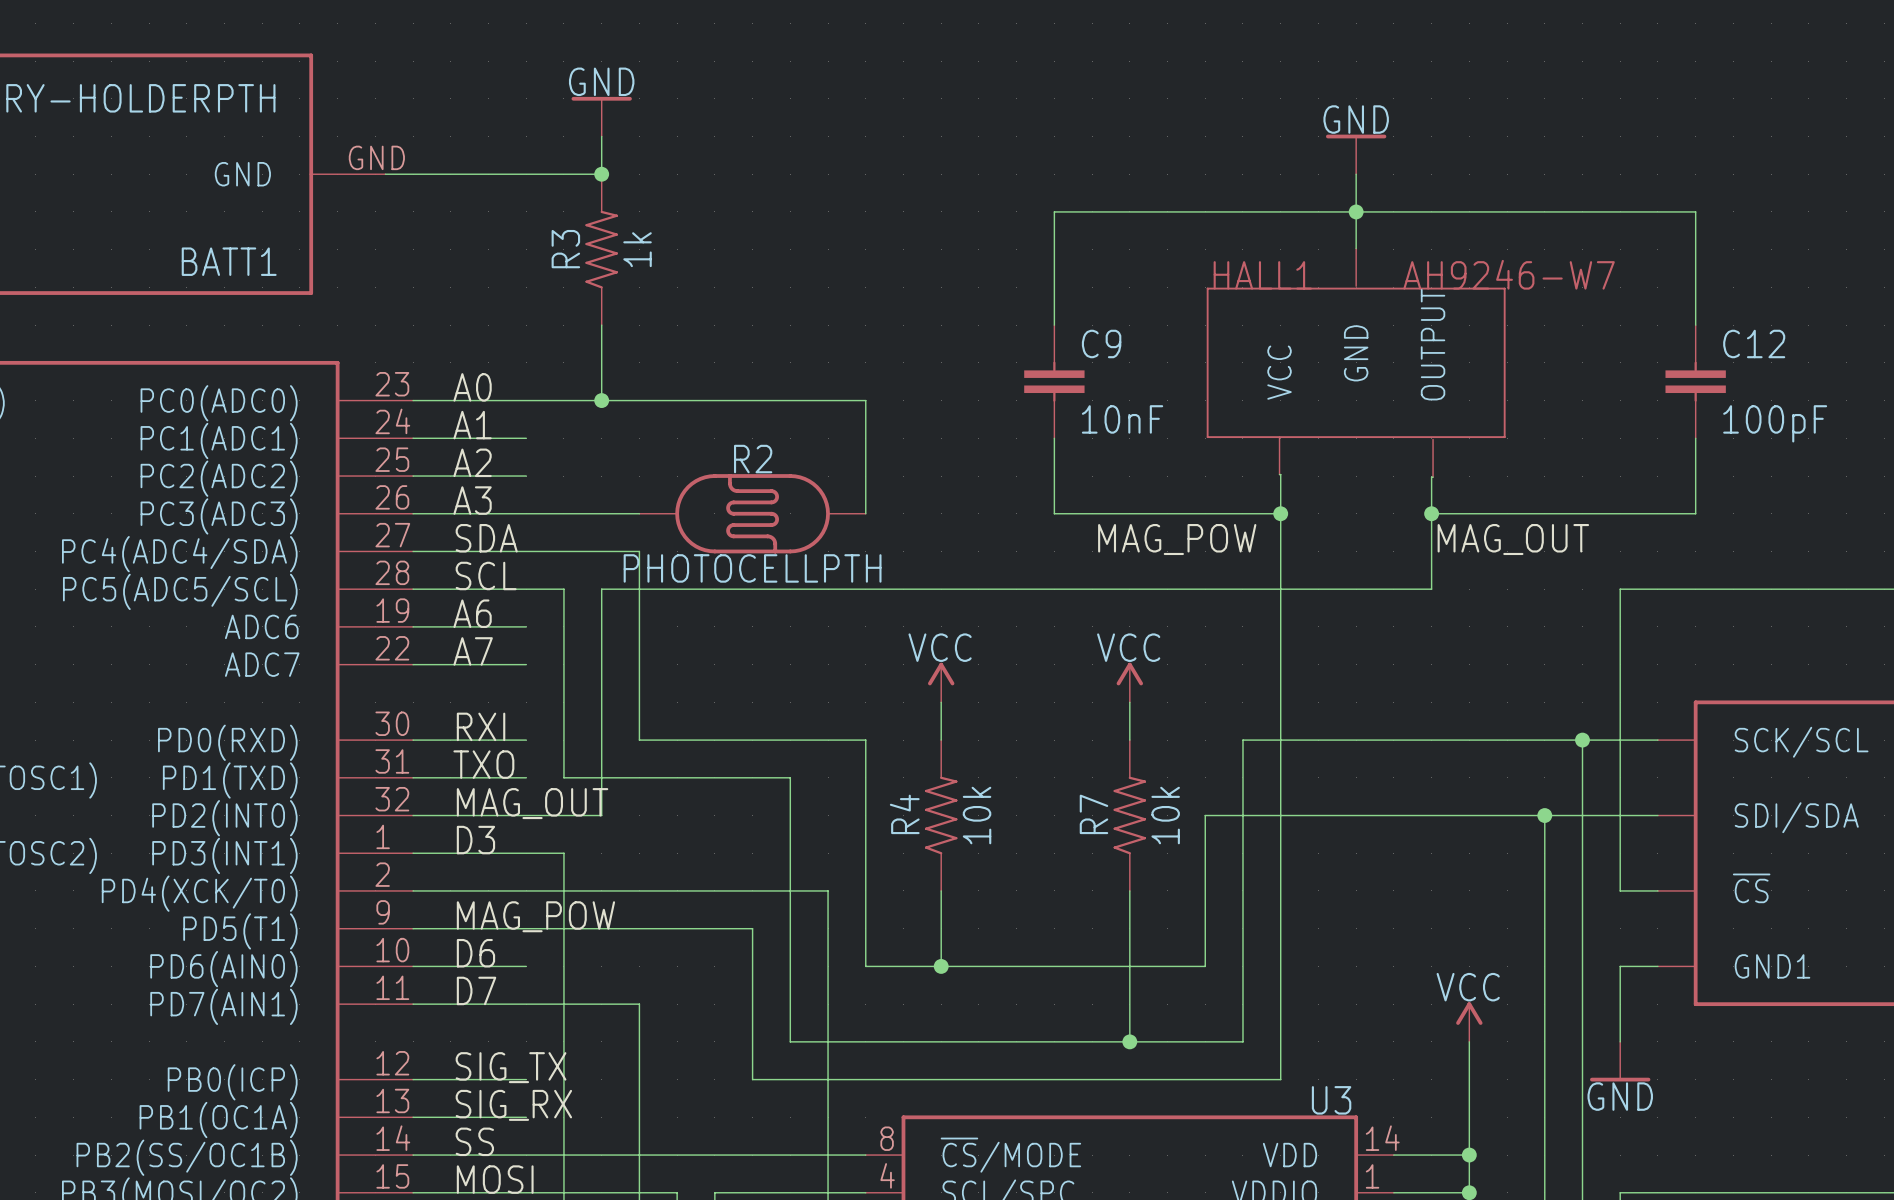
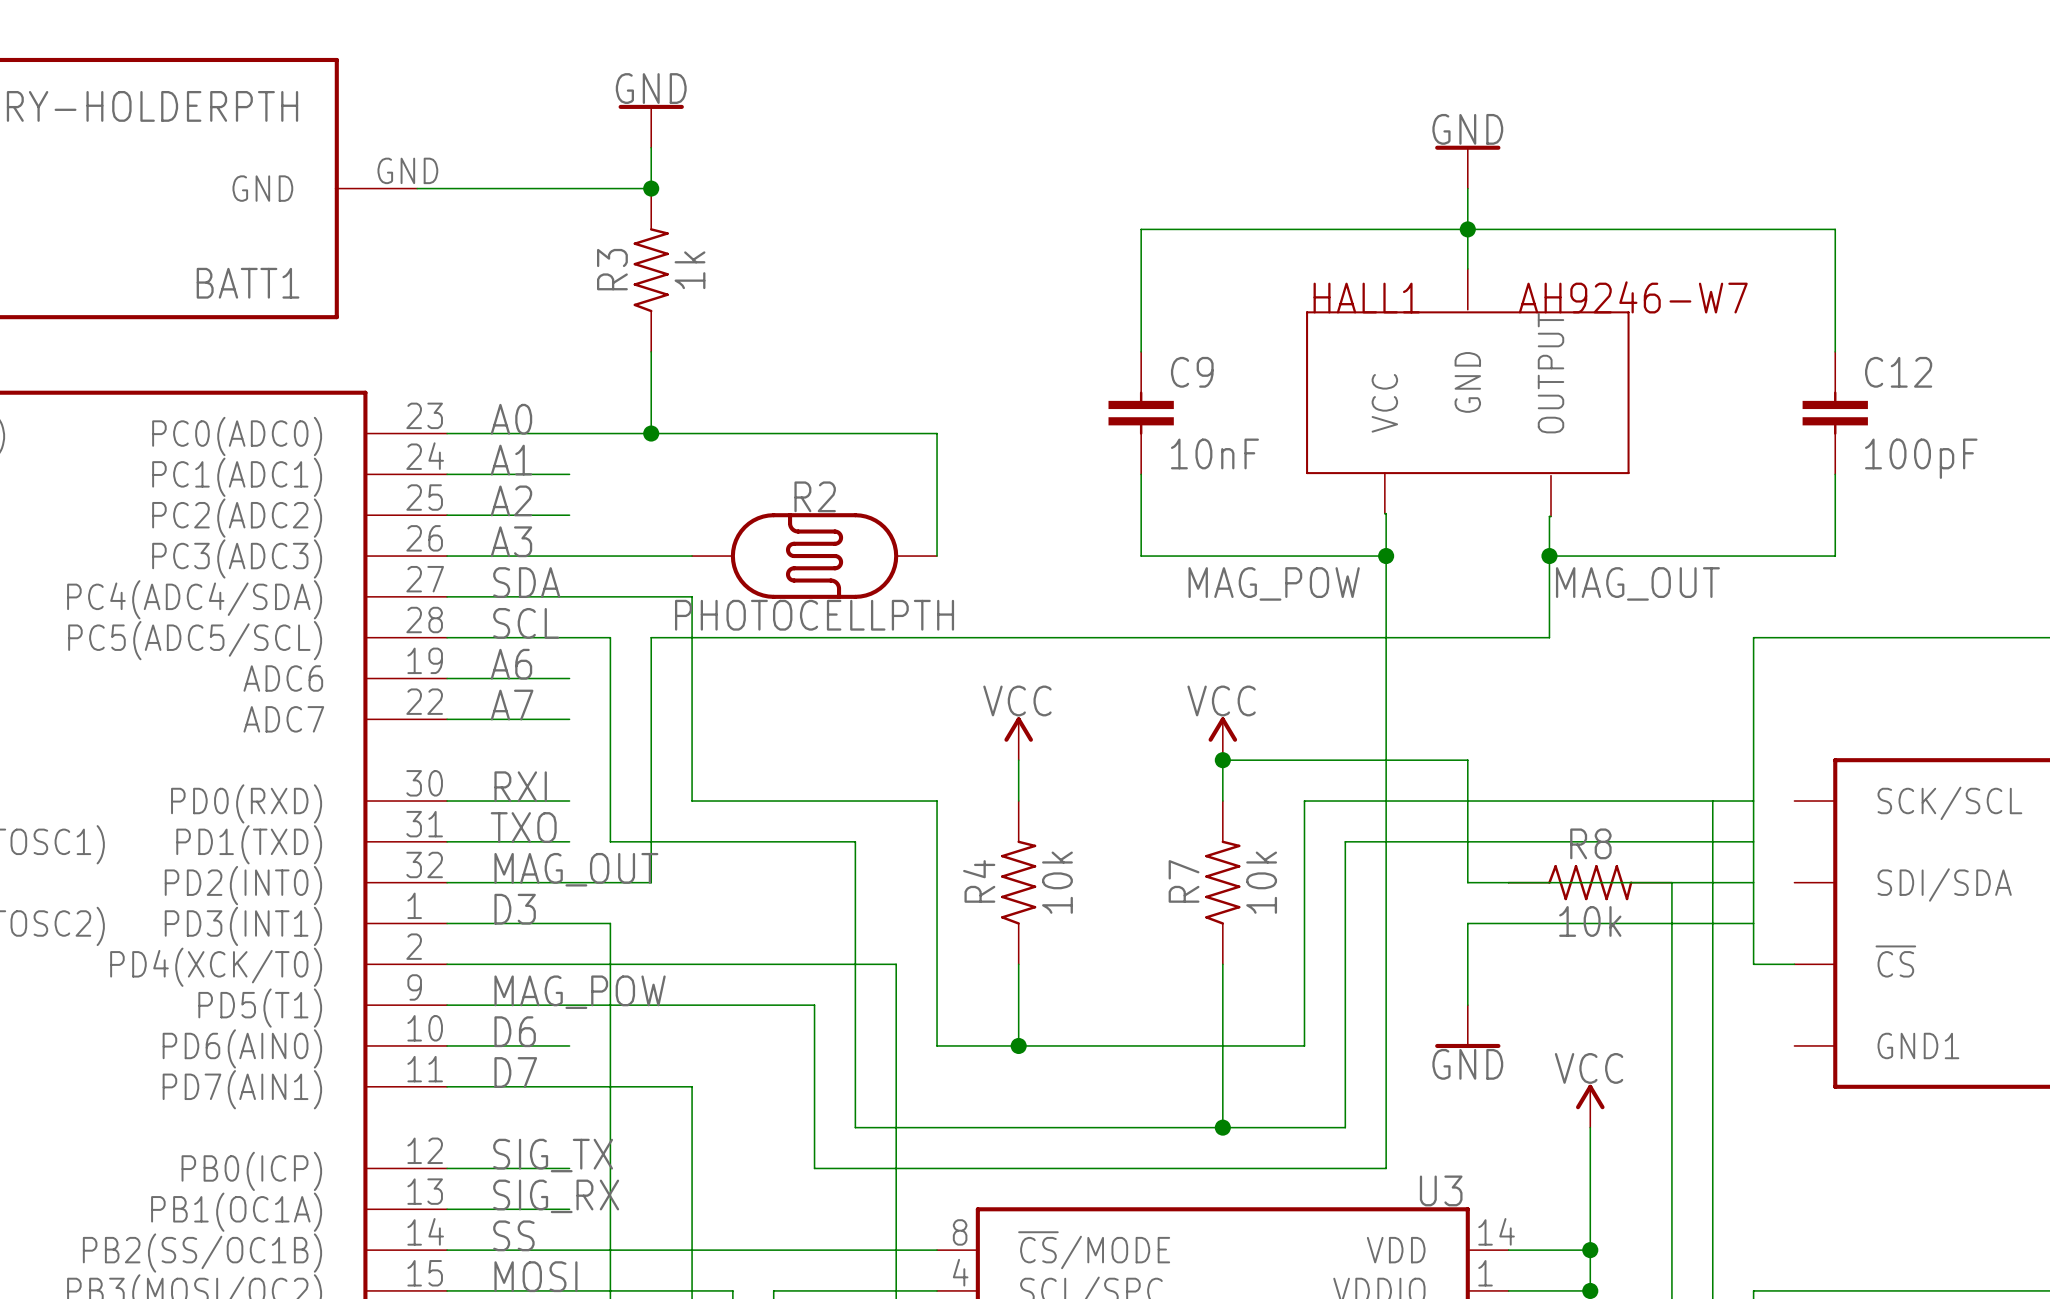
junction: none -> (1222, 760)
wire: (1242, 740) (1242, 777) -> (1345, 801) (1304, 801) (1304, 882)
junction: (1582, 740) -> none
wire: (1620, 740) (1657, 740) -> none
wire: none -> (1345, 841) (1753, 841)
wire: (1205, 815) (1356, 815) -> (1222, 760) (1467, 760) (1467, 882)
R8: none -> 10k (1590, 882)
junction: (1544, 815) -> none
wire: (1620, 815) (1657, 815) -> none
wire: none -> (1753, 923) (1467, 923) (1467, 1005)
power symbol: none -> GND (1467, 1026)
wire: (1657, 966) (1620, 966) (1620, 1041) -> none
power symbol: GND (1620, 1061) -> none

